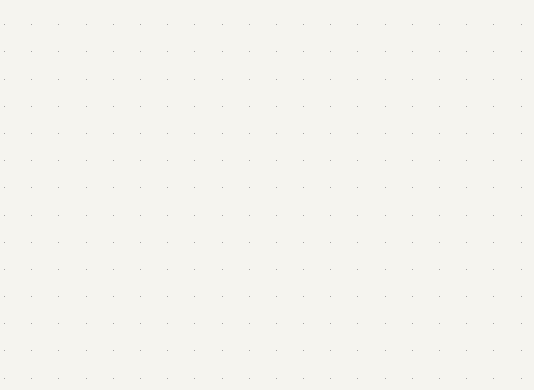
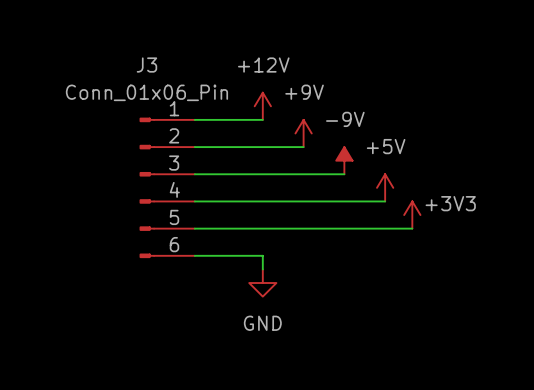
power symbol: none -> +12V (262, 106)
wire: none -> (194, 119) (262, 119)
power symbol: none -> +9V (303, 133)
wire: none -> (194, 147) (303, 147)
power symbol: none -> -9V (344, 160)
wire: none -> (194, 174) (344, 174)
J3: none -> Conn_01x06_Pin (167, 187)
power symbol: none -> +5V (385, 187)
wire: none -> (194, 201) (385, 201)
power symbol: none -> +3V3 (412, 215)
wire: none -> (194, 228) (412, 228)
wire: none -> (194, 255) (262, 255) (262, 269)
power symbol: none -> GND (262, 283)

